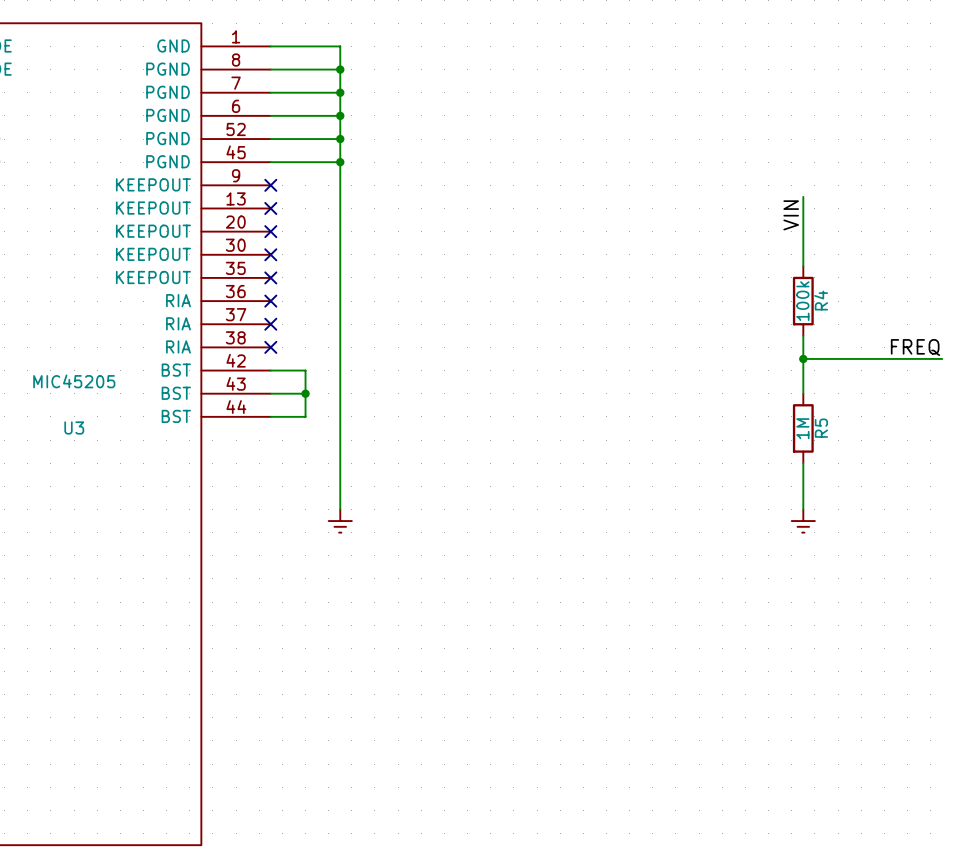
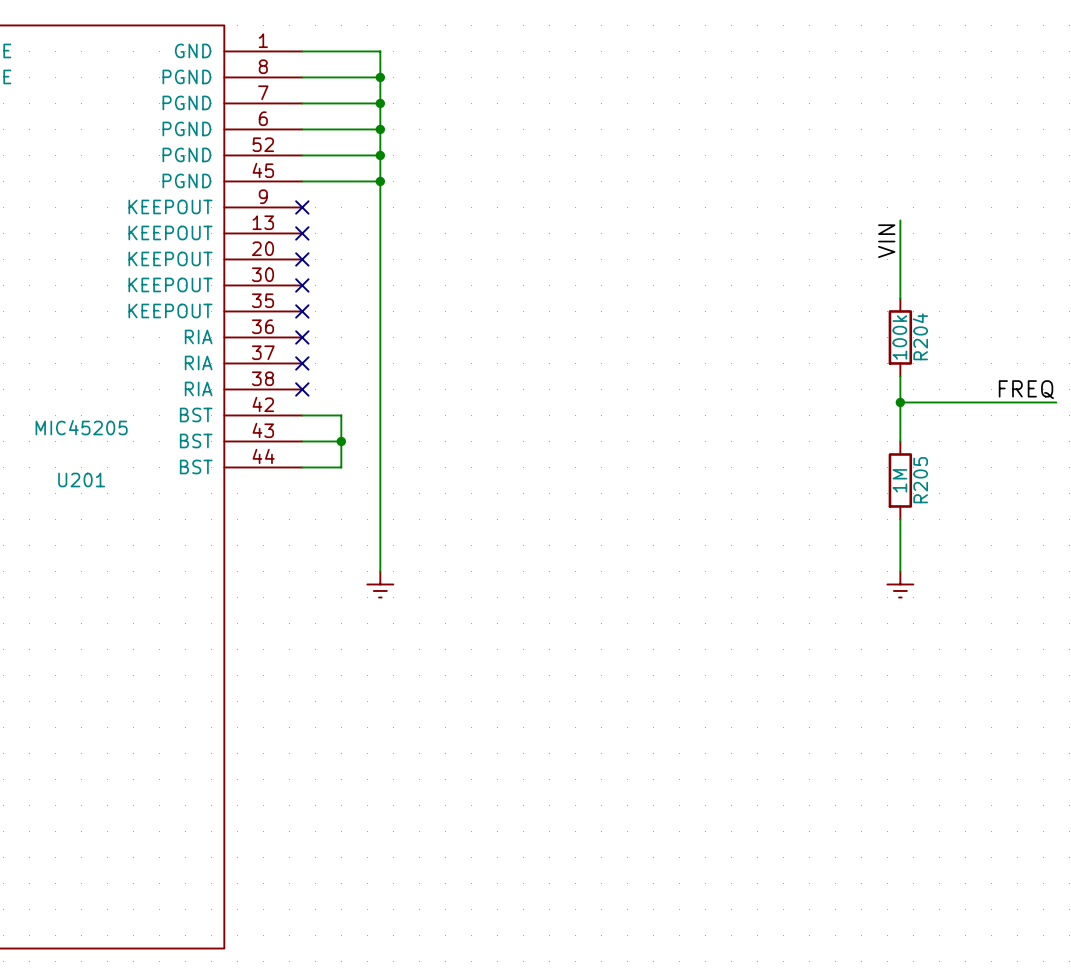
R4 name: R4 (821, 300) -> R204 (920, 336)
U3 name: U3 (74, 428) -> U201 (81, 479)
R5 name: R5 (821, 428) -> R205 (920, 480)

